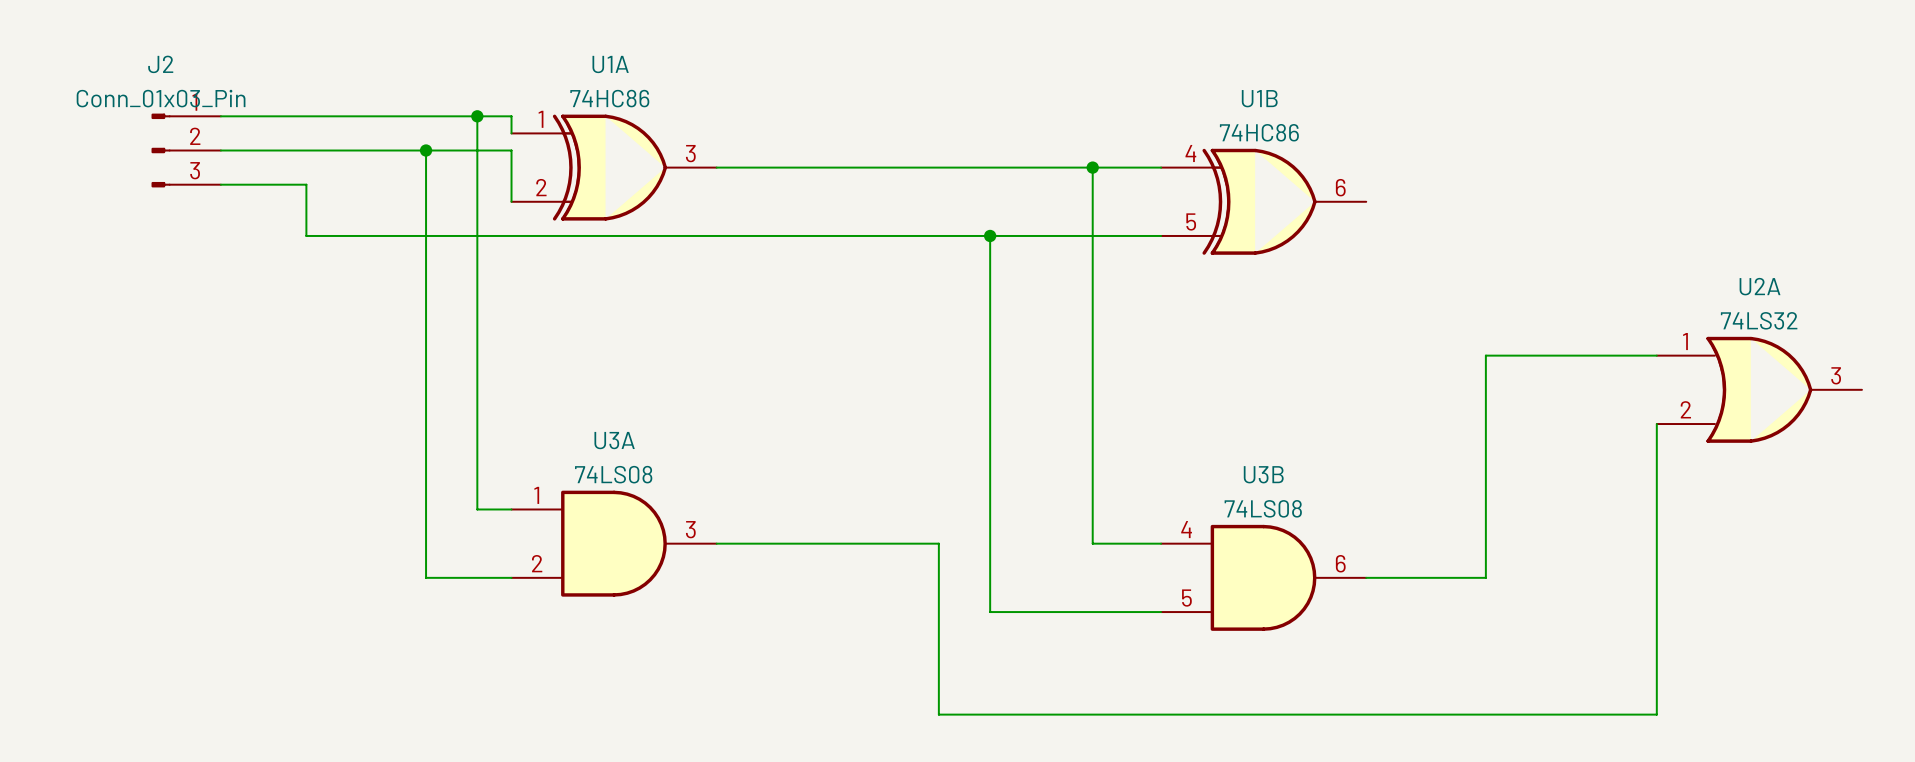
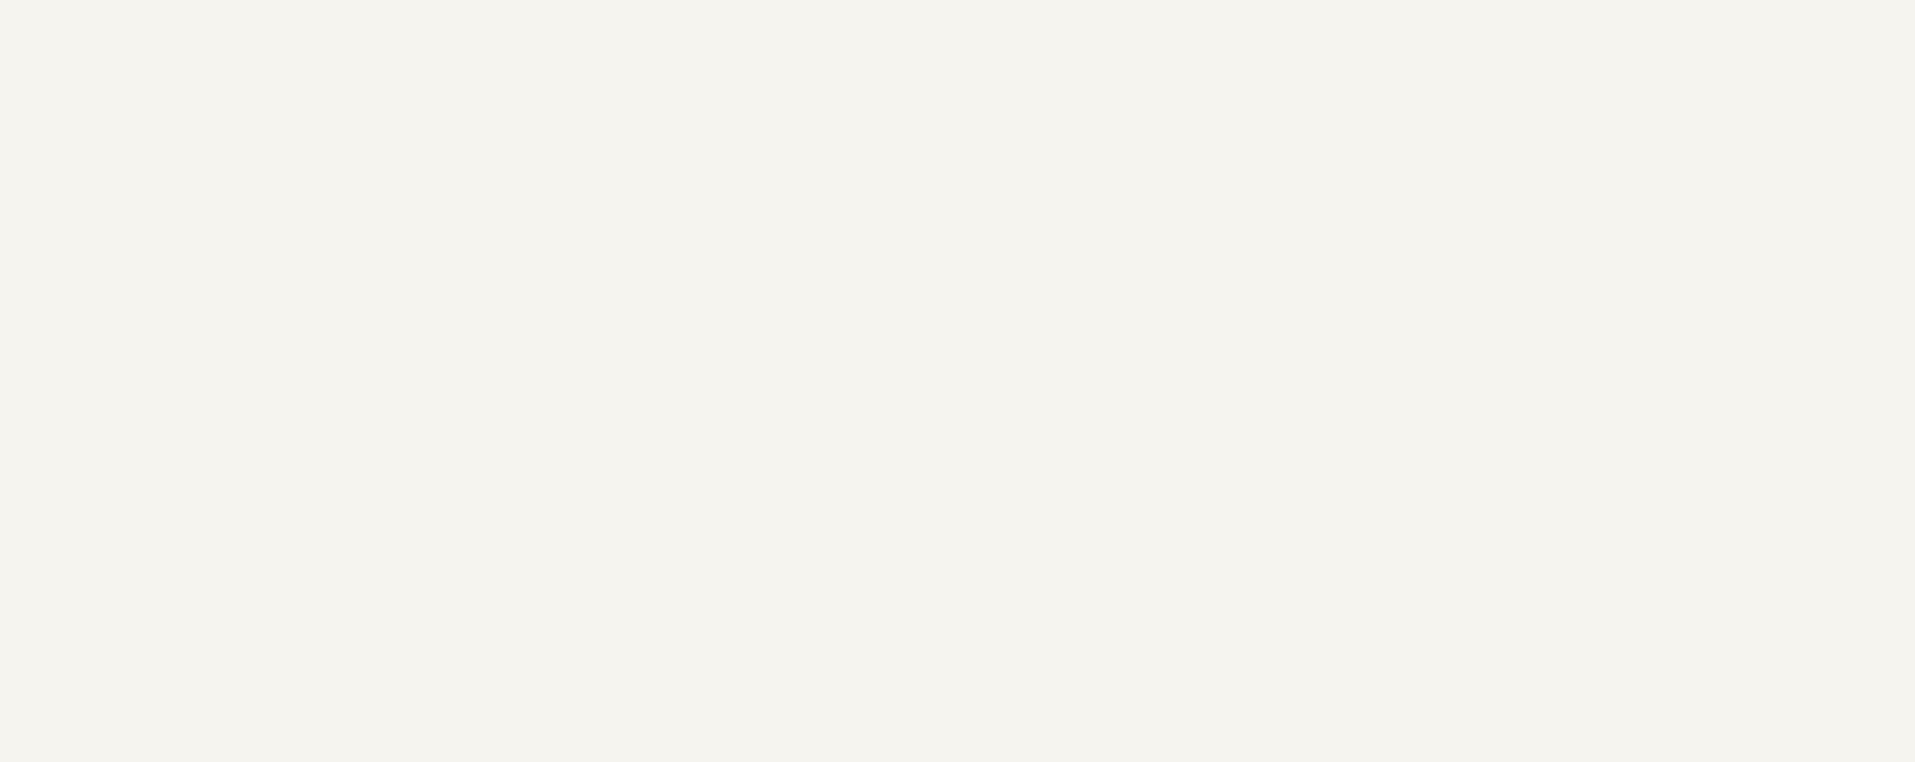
wire: (220, 116) (511, 116) (511, 133) -> none
wire: (477, 116) (477, 509) (511, 509) -> none
junction: (477, 116) -> none
J2: Conn_01x03_Pin (186, 150) -> none
wire: (220, 150) (511, 150) (511, 201) -> none
wire: (426, 150) (426, 577) (511, 577) -> none
junction: (426, 150) -> none
U1A: 74HC86 (614, 167) -> none
wire: (716, 167) (1161, 167) -> none
wire: (1092, 167) (1092, 543) (1161, 543) -> none
junction: (1092, 167) -> none
wire: (220, 184) (306, 184) (306, 235) (1161, 235) -> none
U1B: 74HC86 (1263, 201) -> none
wire: (990, 235) (990, 612) (1161, 612) -> none
junction: (990, 235) -> none
wire: (1656, 355) (1485, 355) (1485, 577) (1366, 577) -> none
U2A: 74LS32 (1759, 389) -> none
wire: (1656, 424) (1656, 714) (938, 714) (938, 543) (716, 543) -> none
U3A: 74LS08 (614, 543) -> none
U3B: 74LS08 (1263, 577) -> none

